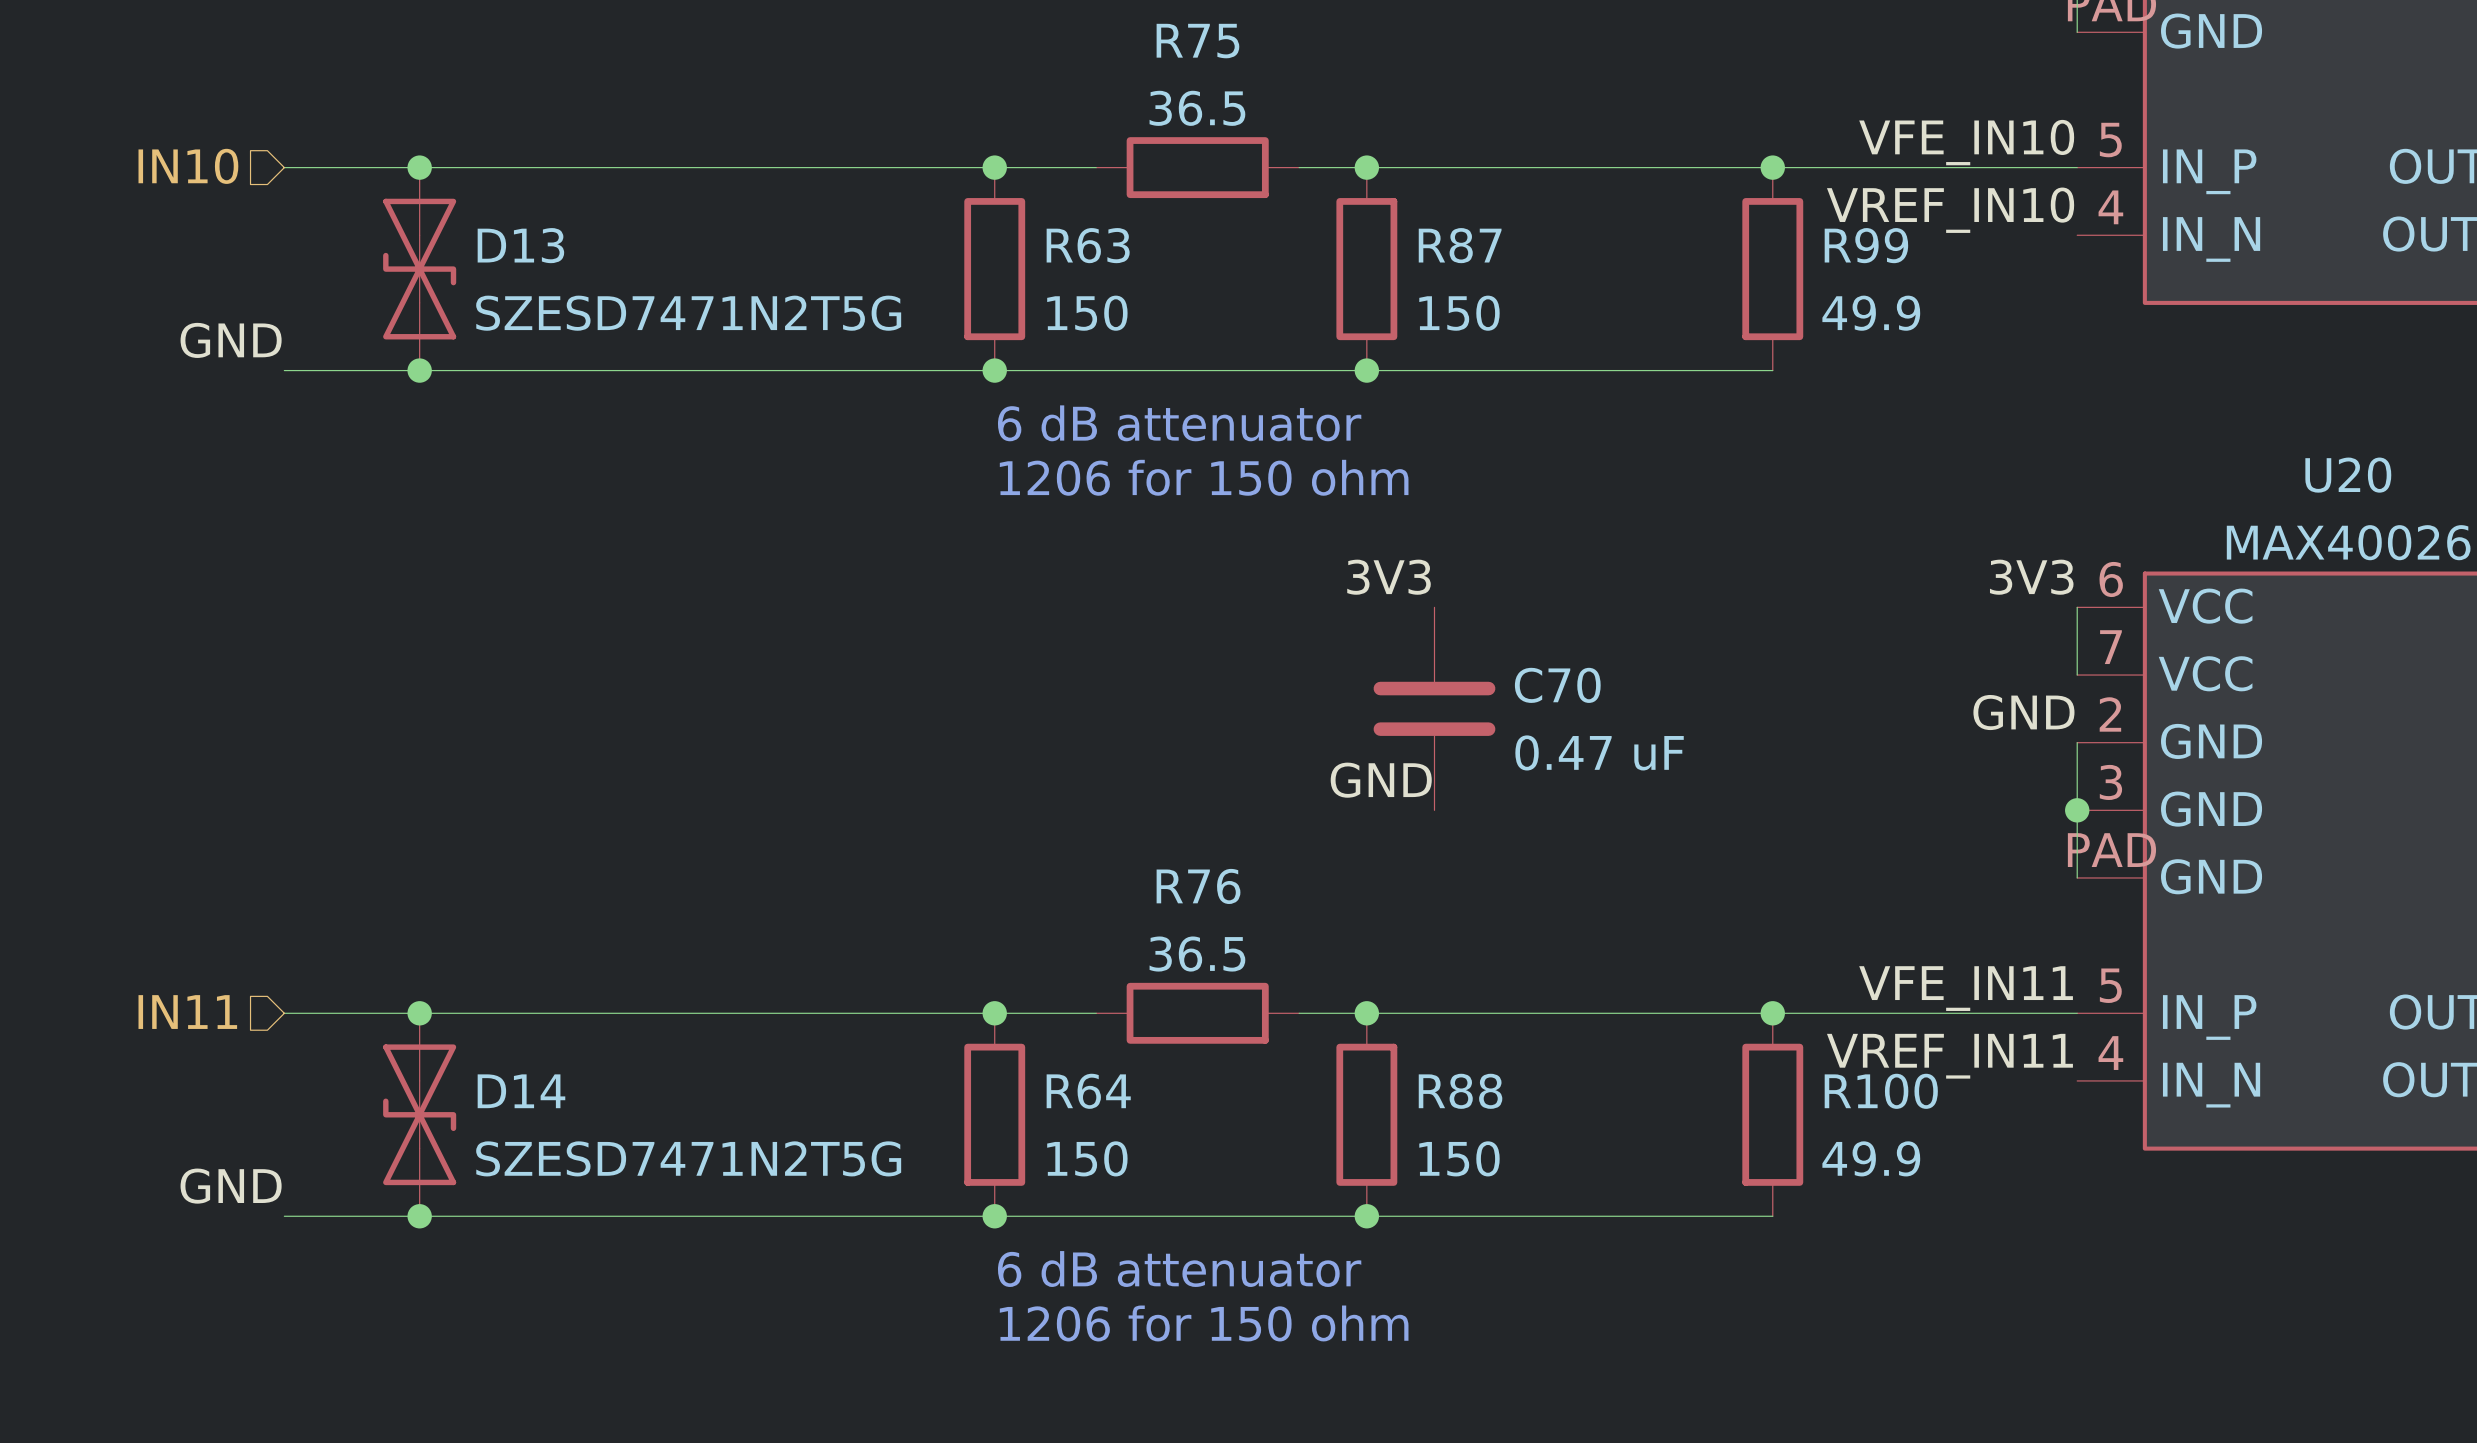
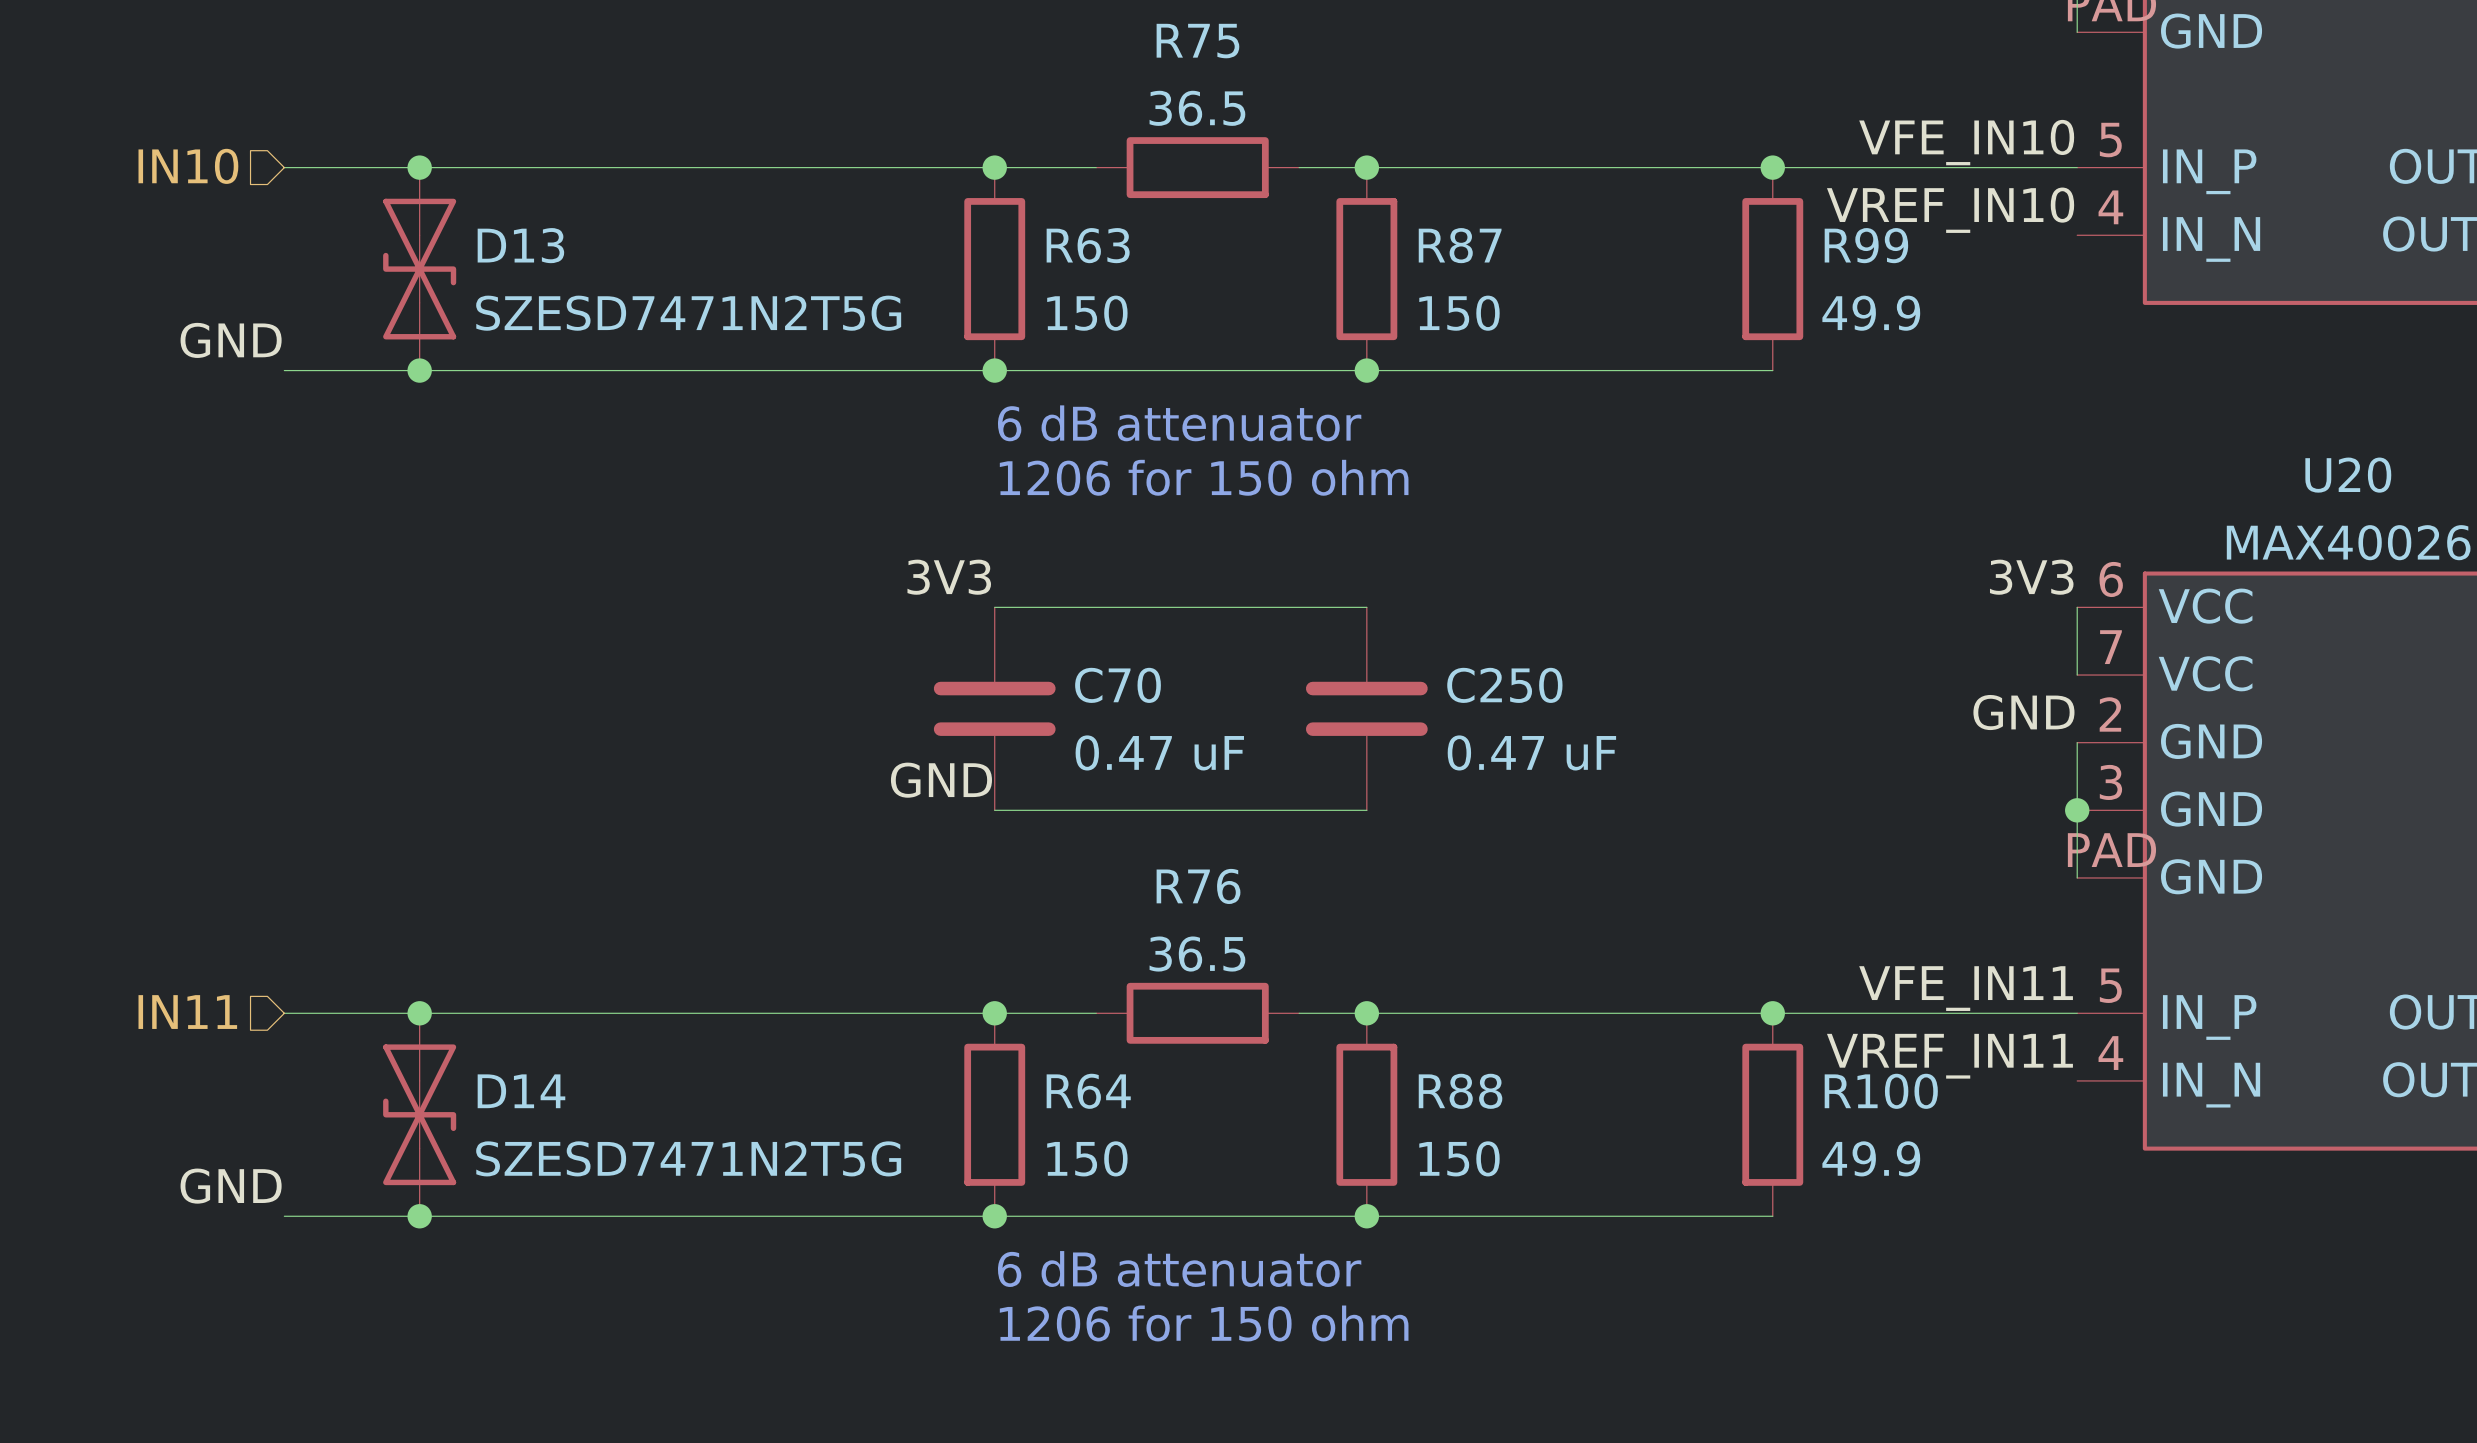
label position: 3V3 (1389, 577) -> 3V3 (949, 577)
wire: none -> (994, 607) (1366, 607)
C250: none -> 0.47 uF (1366, 708)
C70 position: (1434, 708) -> (994, 708)
label position: GND (1381, 780) -> GND (941, 780)
wire: none -> (994, 810) (1366, 810)

